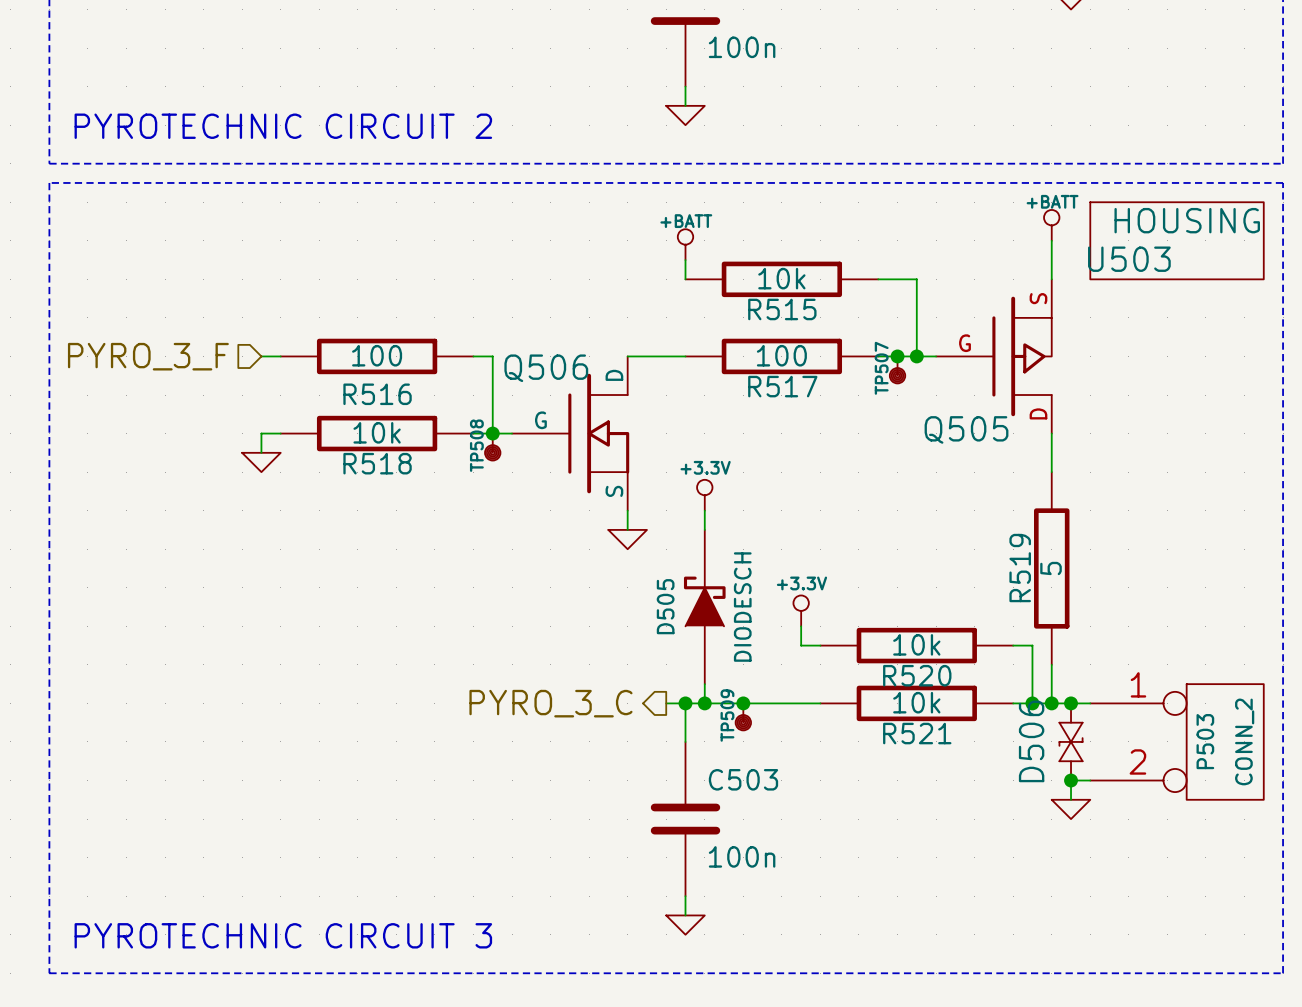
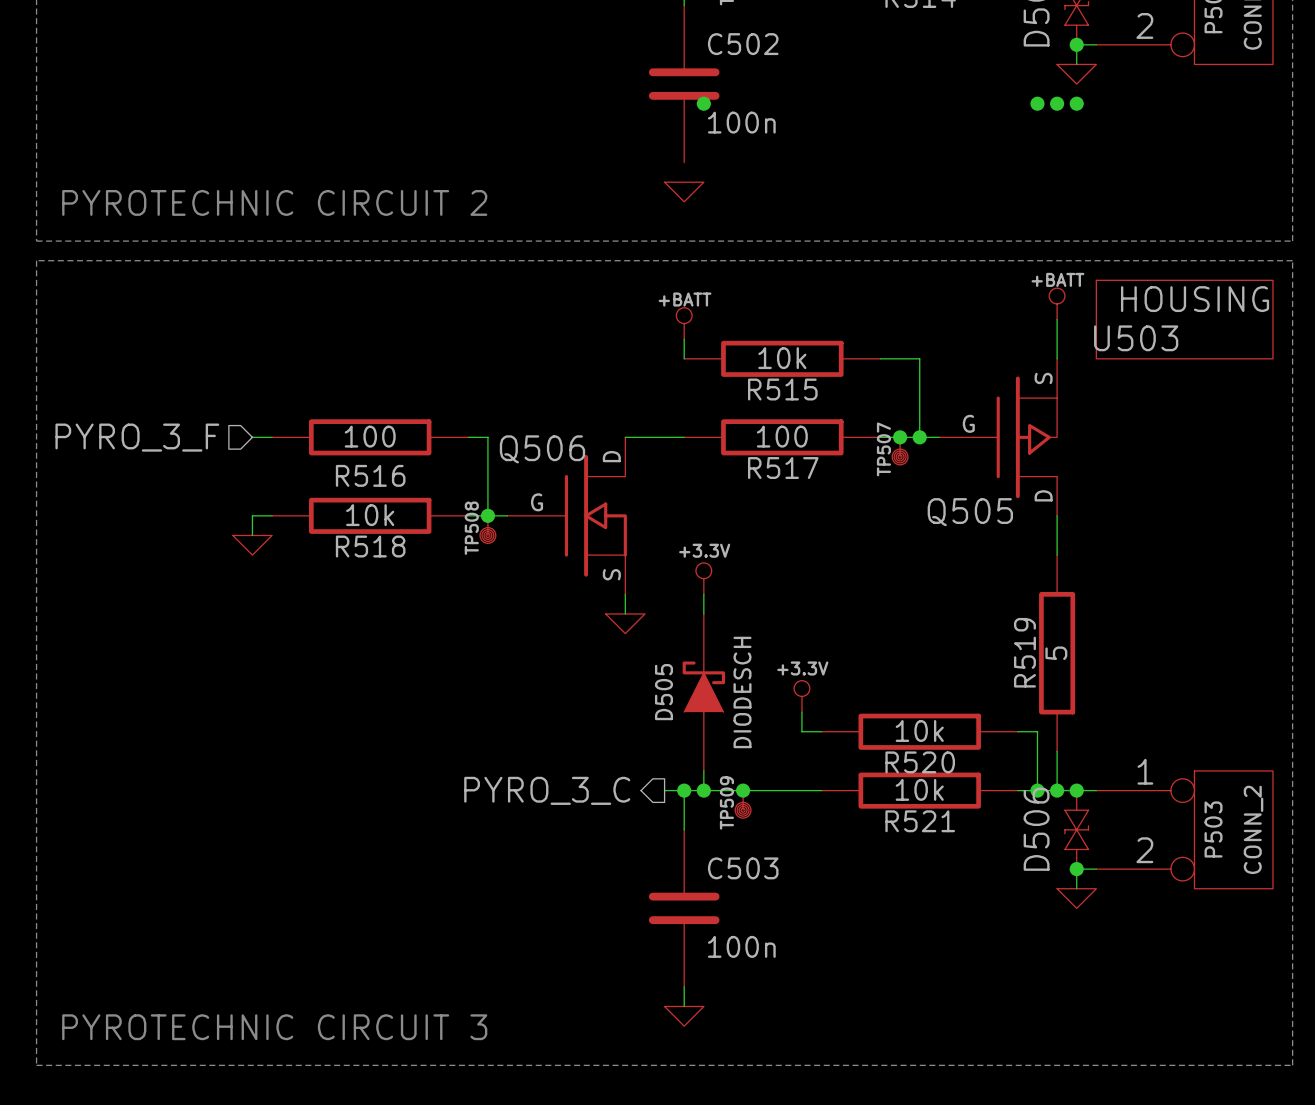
junction: none -> (703, 103)
junction: none -> (1037, 103)
junction: none -> (1057, 103)
junction: none -> (1076, 103)
wire: (685, 86) (685, 105) -> none

